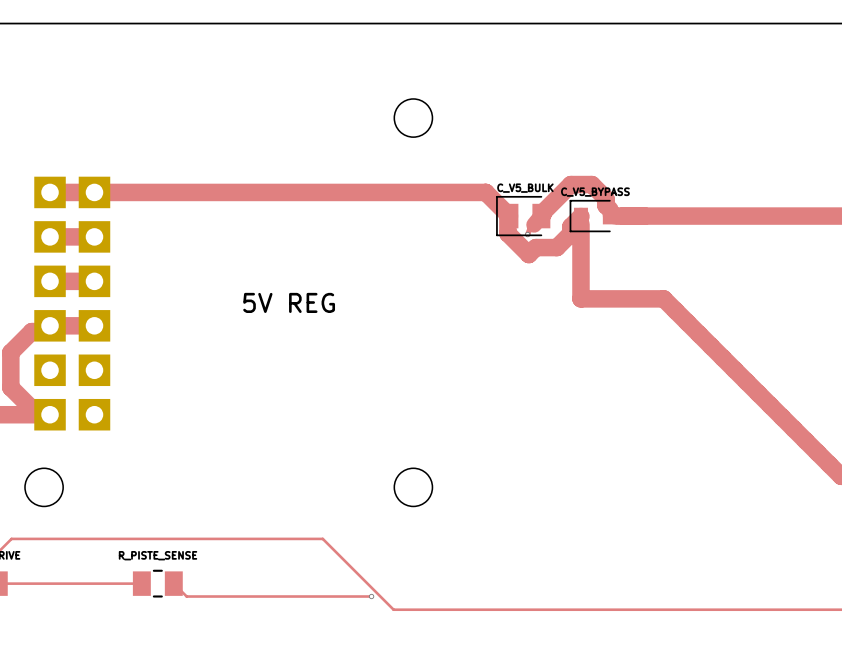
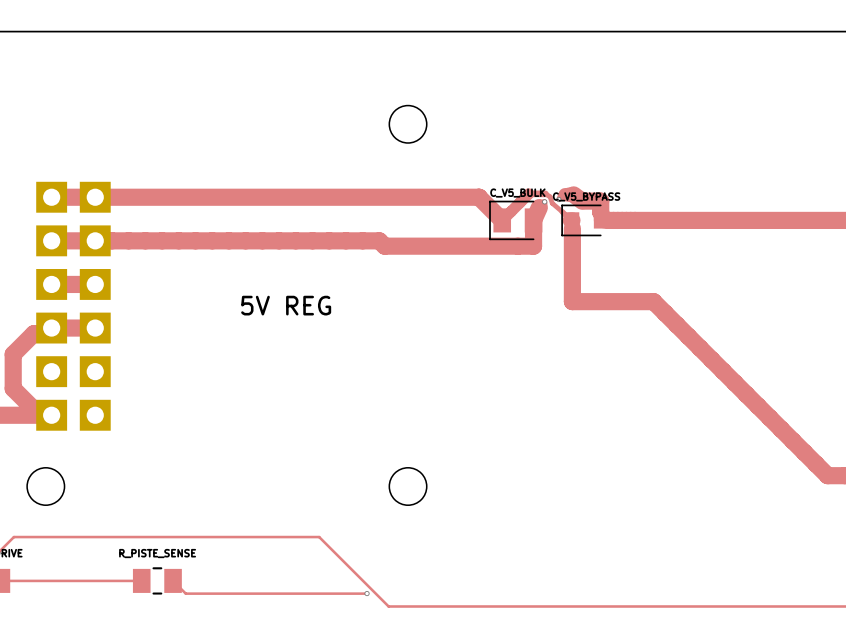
via: none -> (558, 199)
track: none -> (544, 201) (539, 207) (533, 220) (533, 246) (384, 246) (379, 240) (95, 240)
via: none -> (544, 201)
track: (609, 209) (605, 205) (605, 198) (591, 184) (570, 184) (542, 212) (527, 234) -> (600, 213) (600, 201) (582, 201) (573, 194) (560, 194) (558, 199)
track: (507, 214) (507, 233) (528, 254) (535, 247) (556, 247) (570, 233) (570, 226) (580, 216) -> (502, 220) (528, 193) (545, 193) (550, 196) (552, 203) (572, 220)
via: (527, 234) -> none

